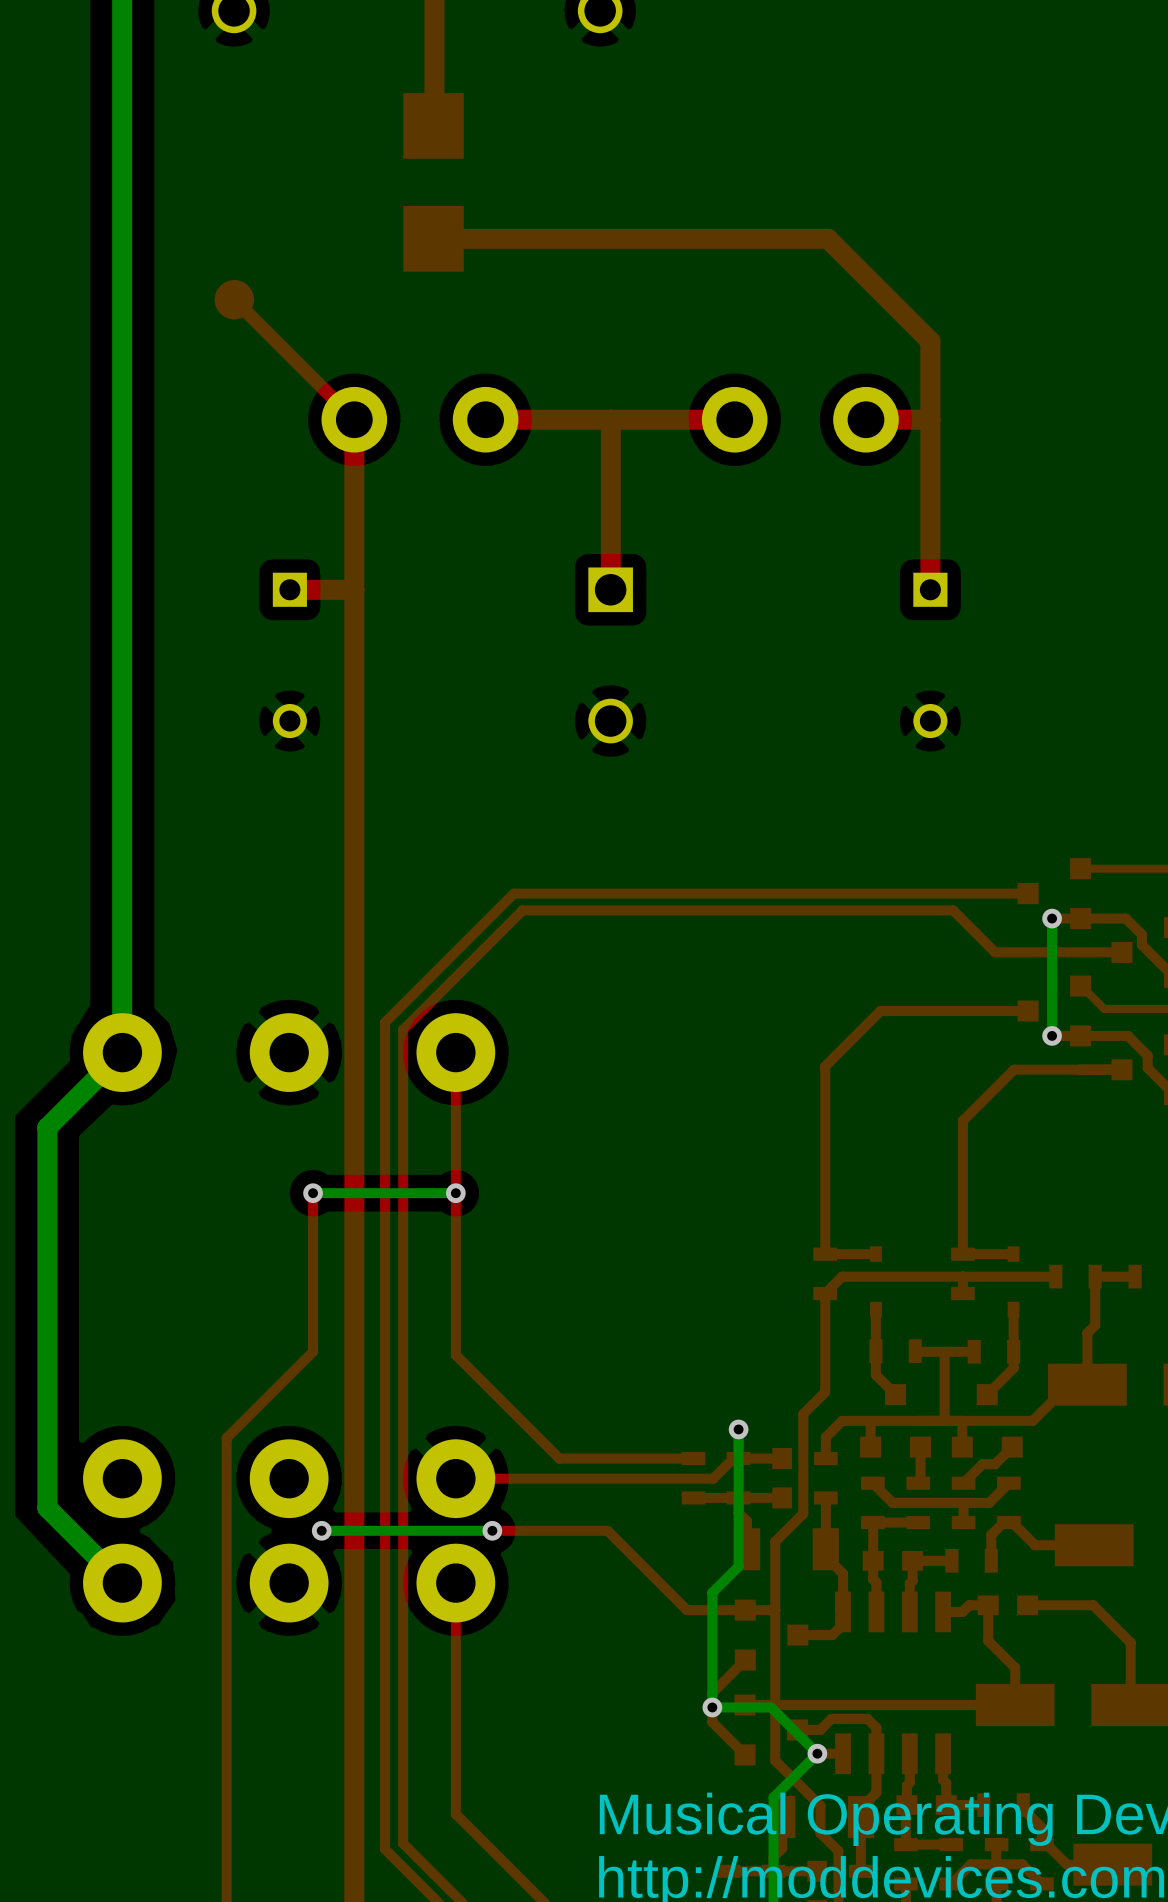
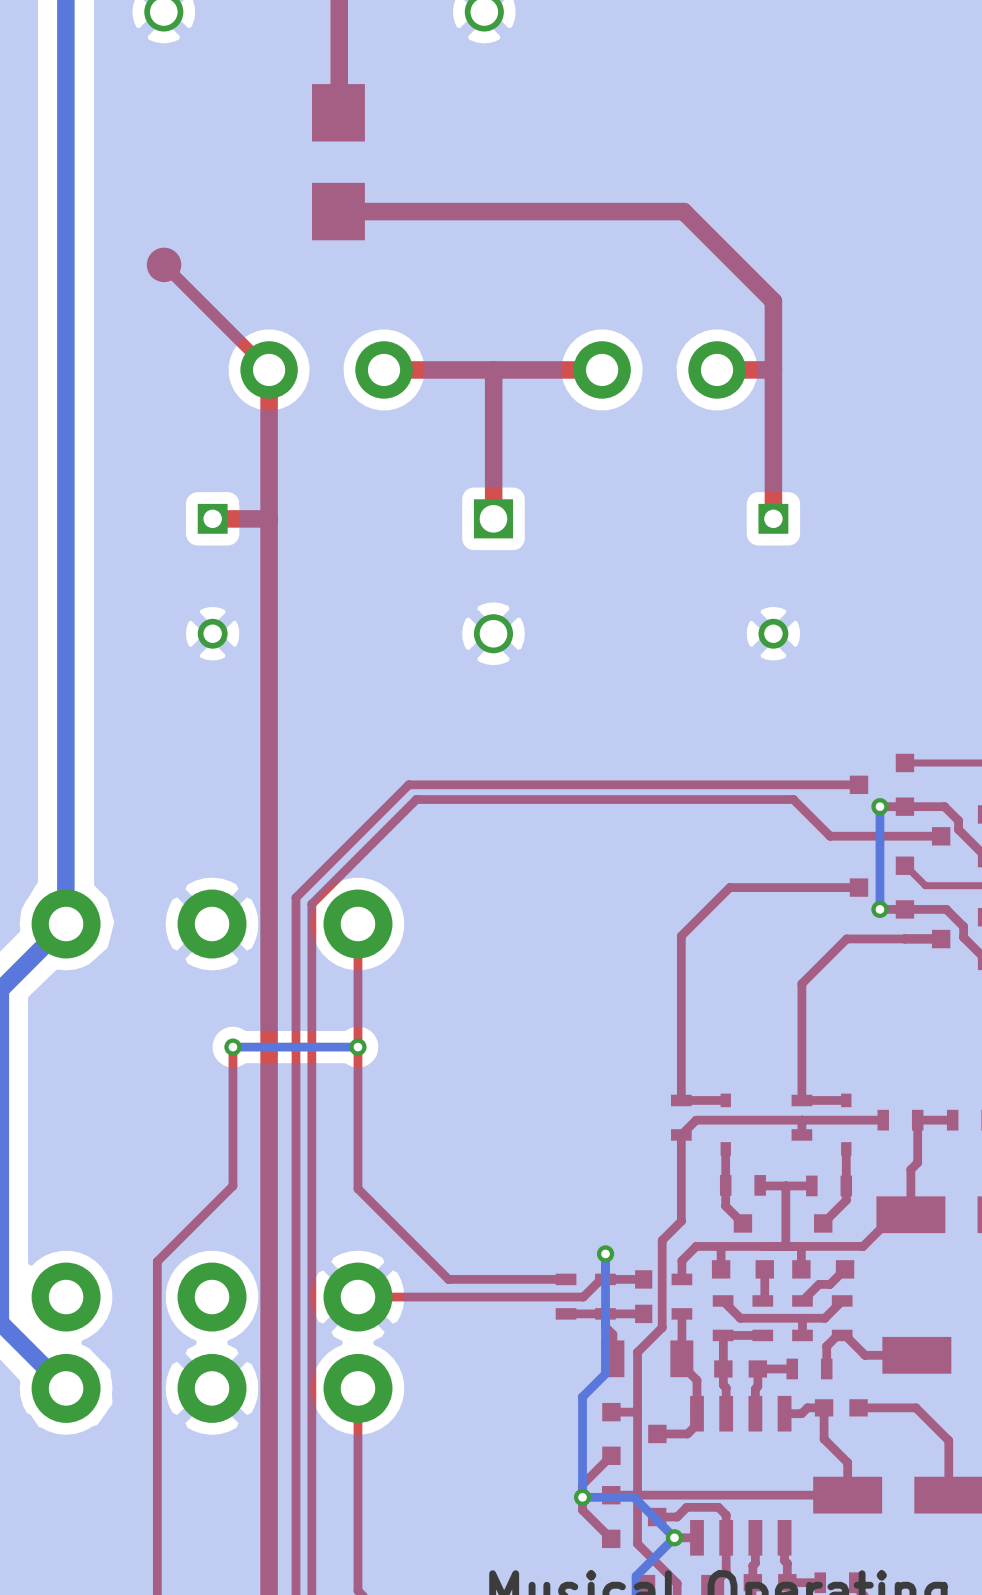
via: (321, 1530) -> none
top track: (492, 1530) (607, 1530) (686, 1610) (745, 1610) -> none
bottom track: (492, 1530) (321, 1530) -> none
via: (492, 1530) -> none

